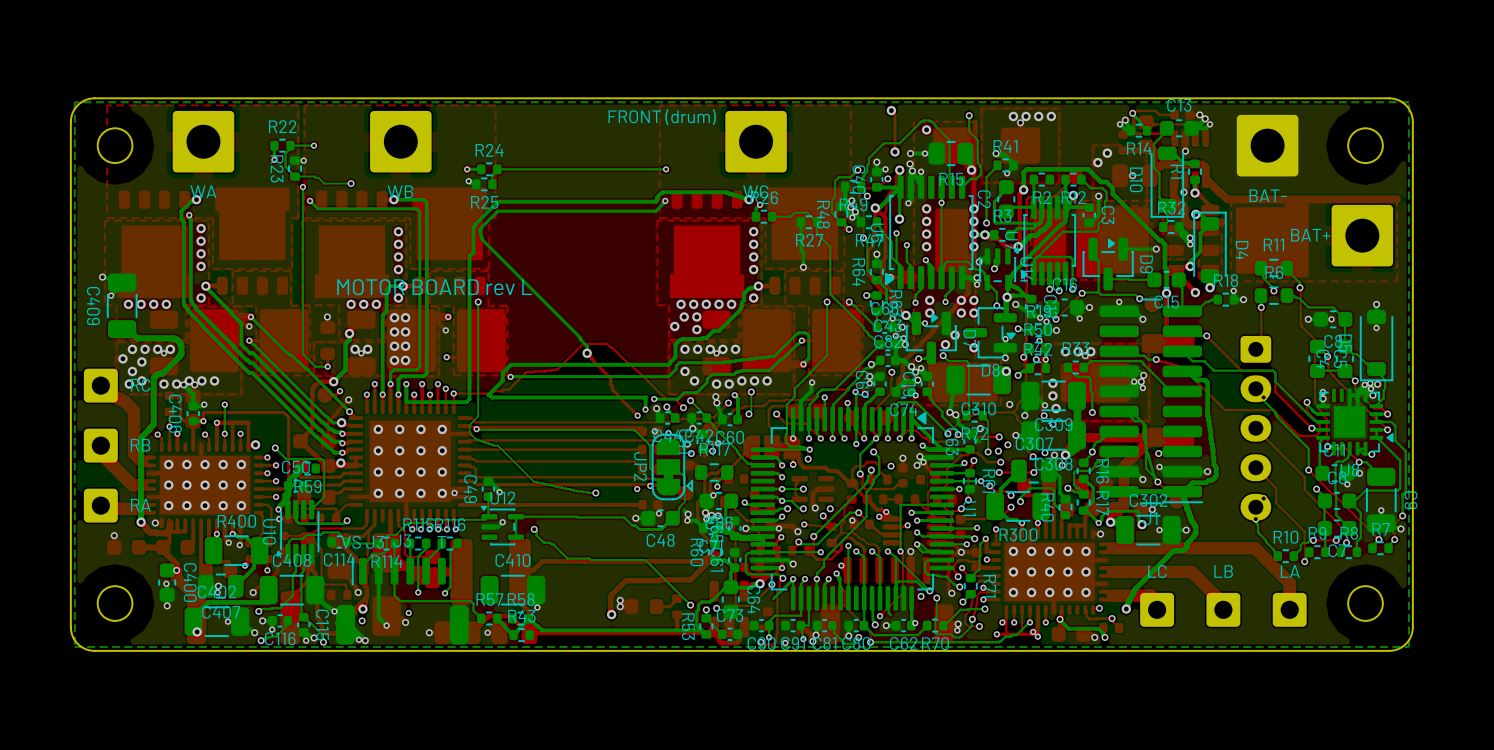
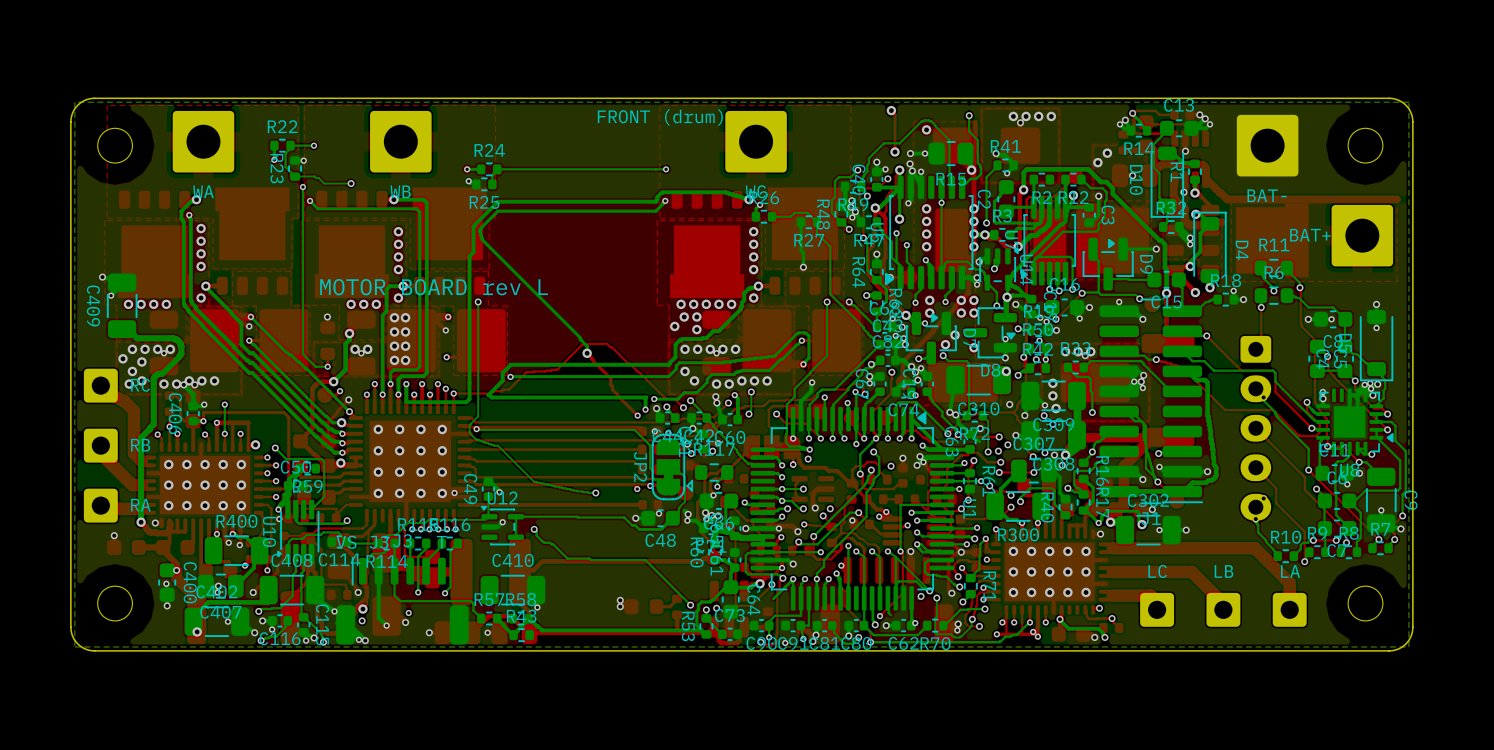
bottom track: (1182, 491) (1191, 519) (1195, 526) (1195, 533) (1187, 543) (1184, 549) (1173, 550) (1134, 589) (1126, 609) -> none
top track: (713, 557) (690, 579) (625, 580) (610, 596) (611, 614) -> none
via: (1126, 609) -> none
via: (611, 614) -> none

